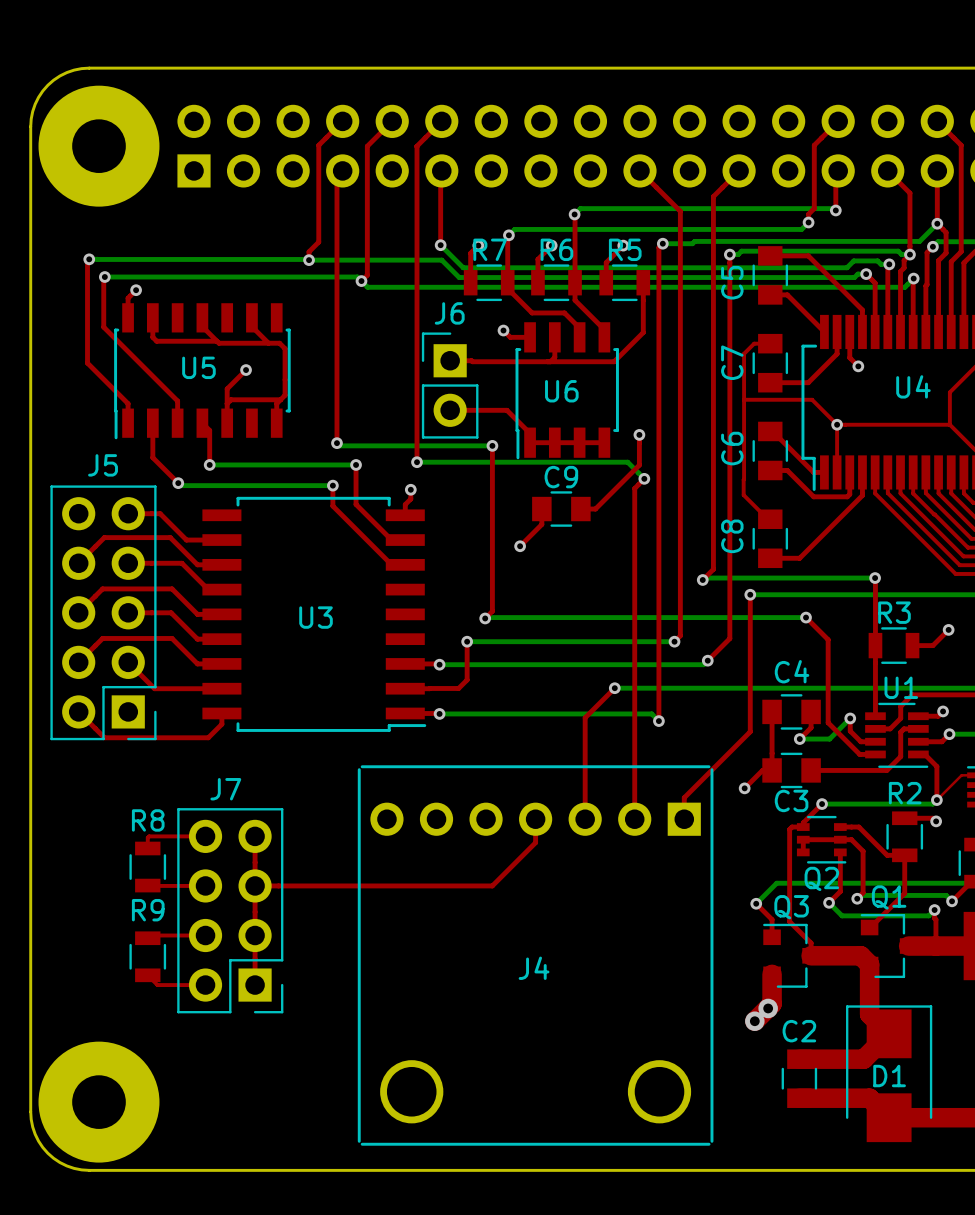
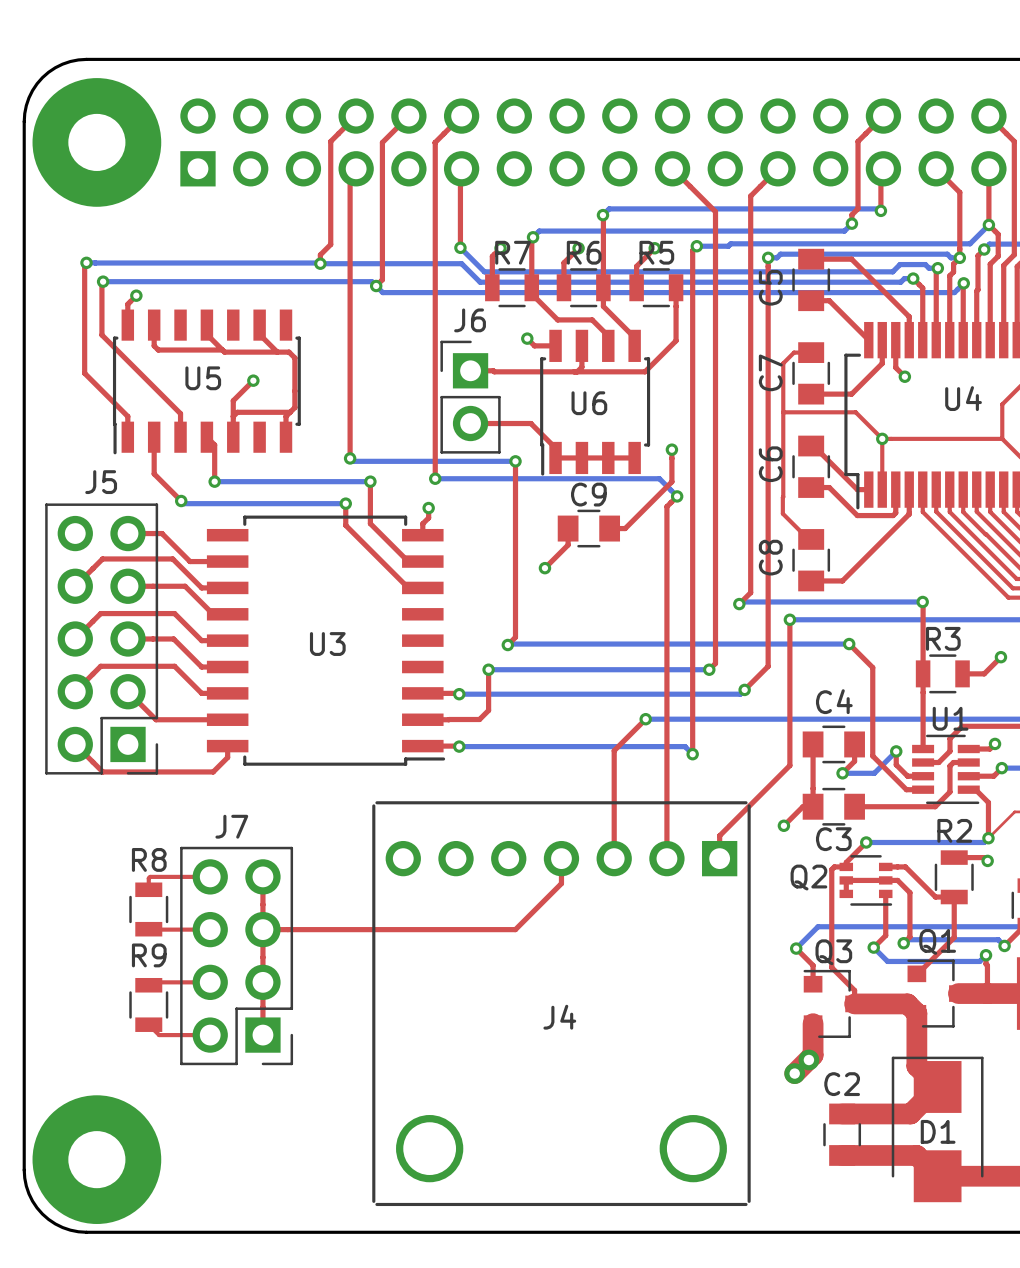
Q2 name position: Q2 (821, 878) -> Q2 (808, 877)

